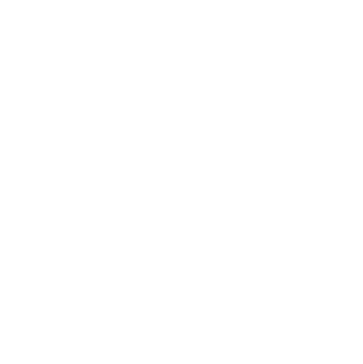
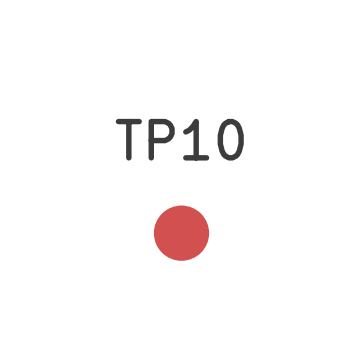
TP10: none -> (181, 233)

